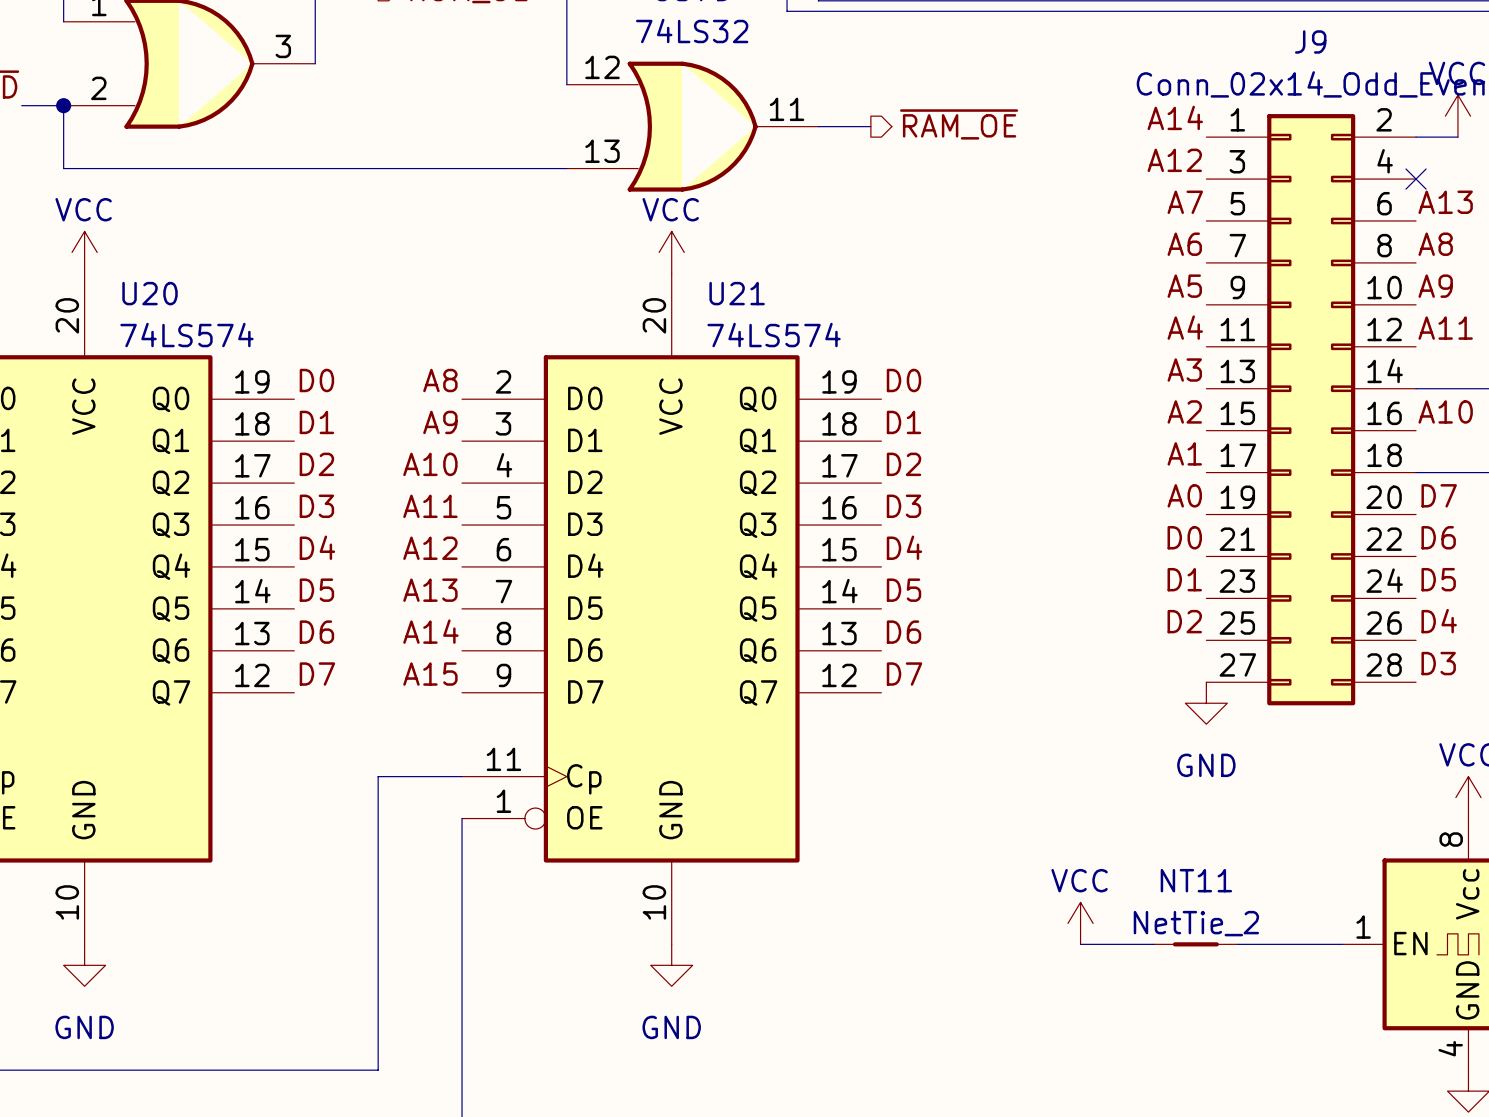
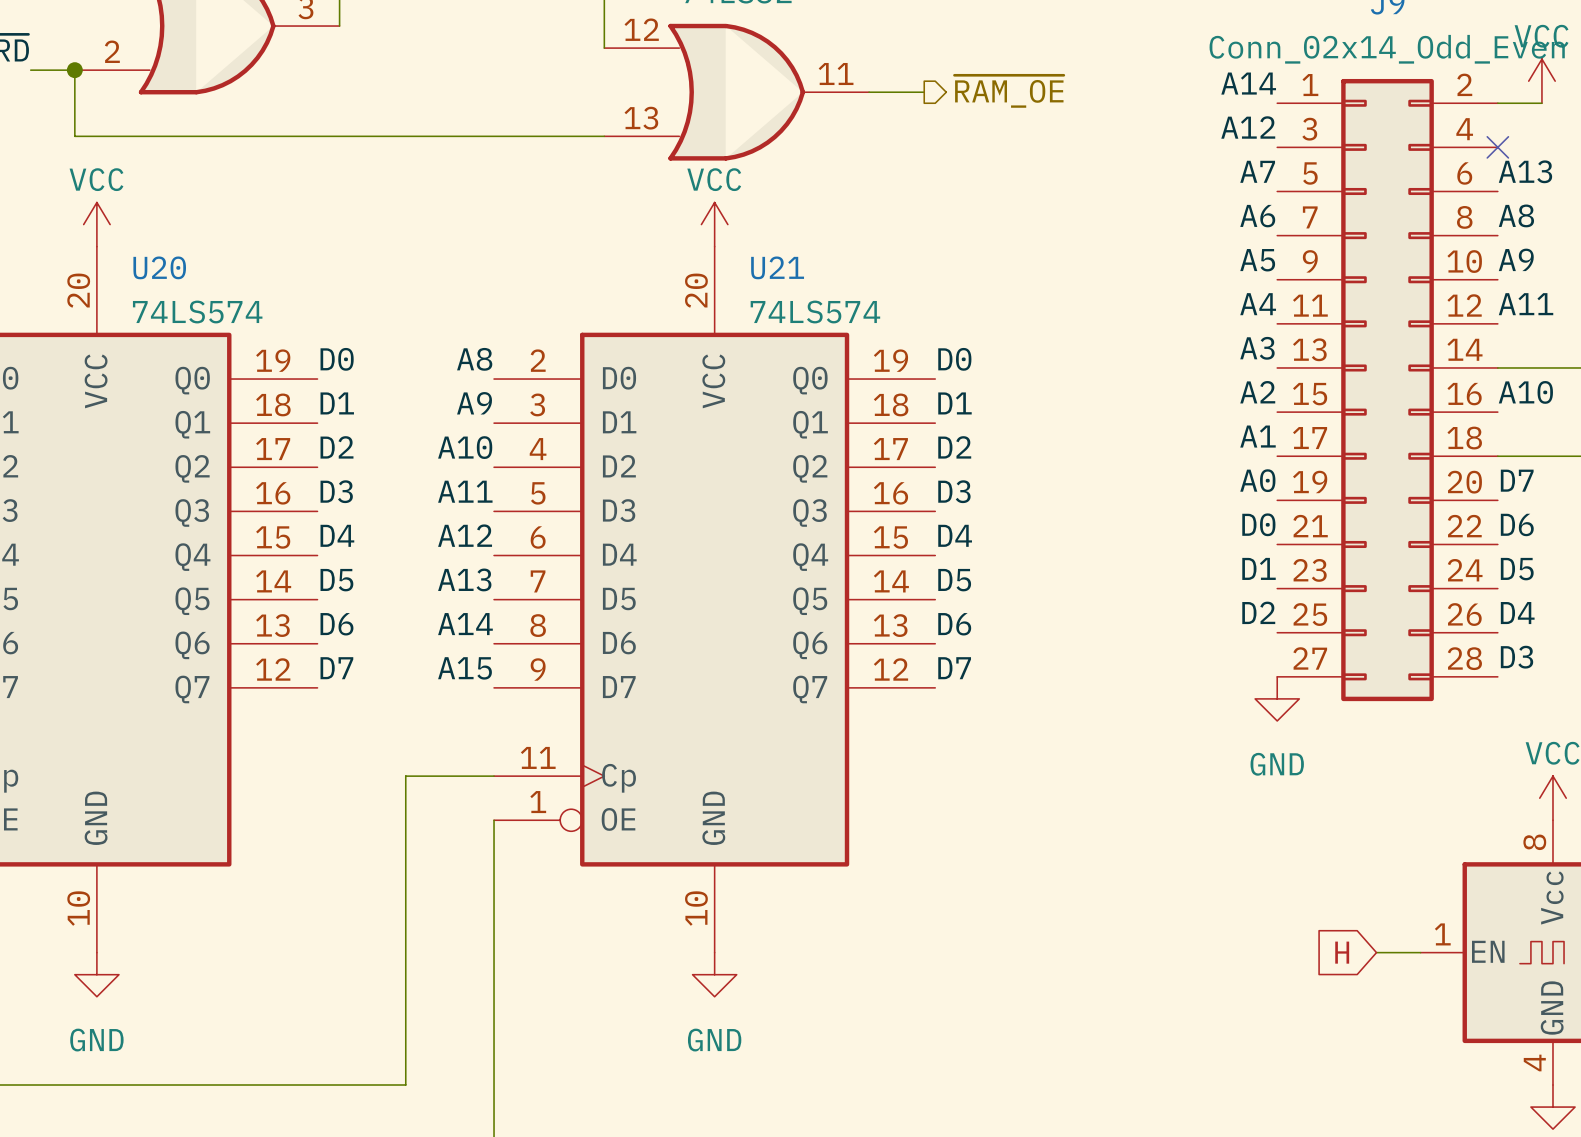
power symbol: VCC (1080, 923) -> none
wire: (1080, 944) (1153, 944) -> none
NT11: NetTie_2 (1195, 944) -> none
wire: (1237, 944) (1300, 944) -> none
global label: none -> H (1342, 952)

